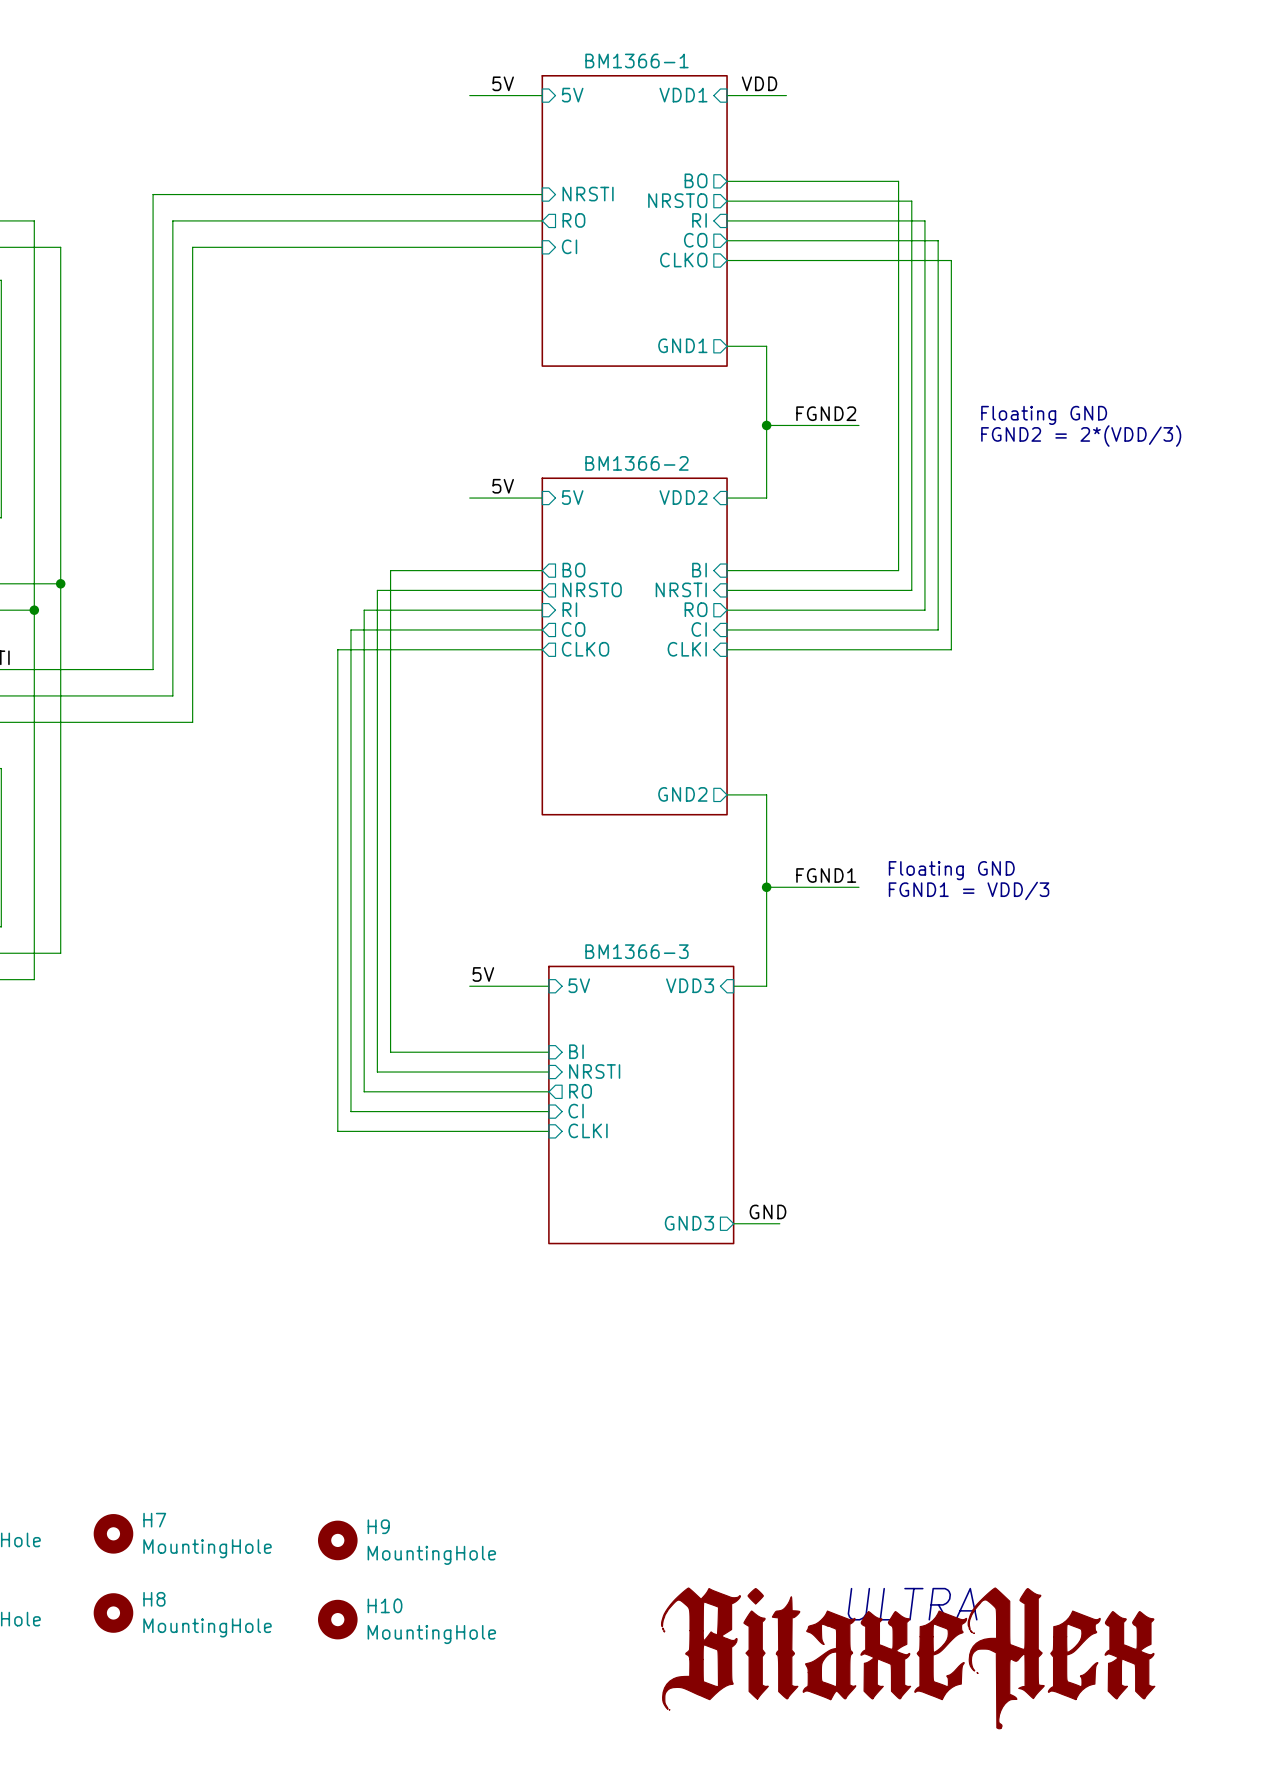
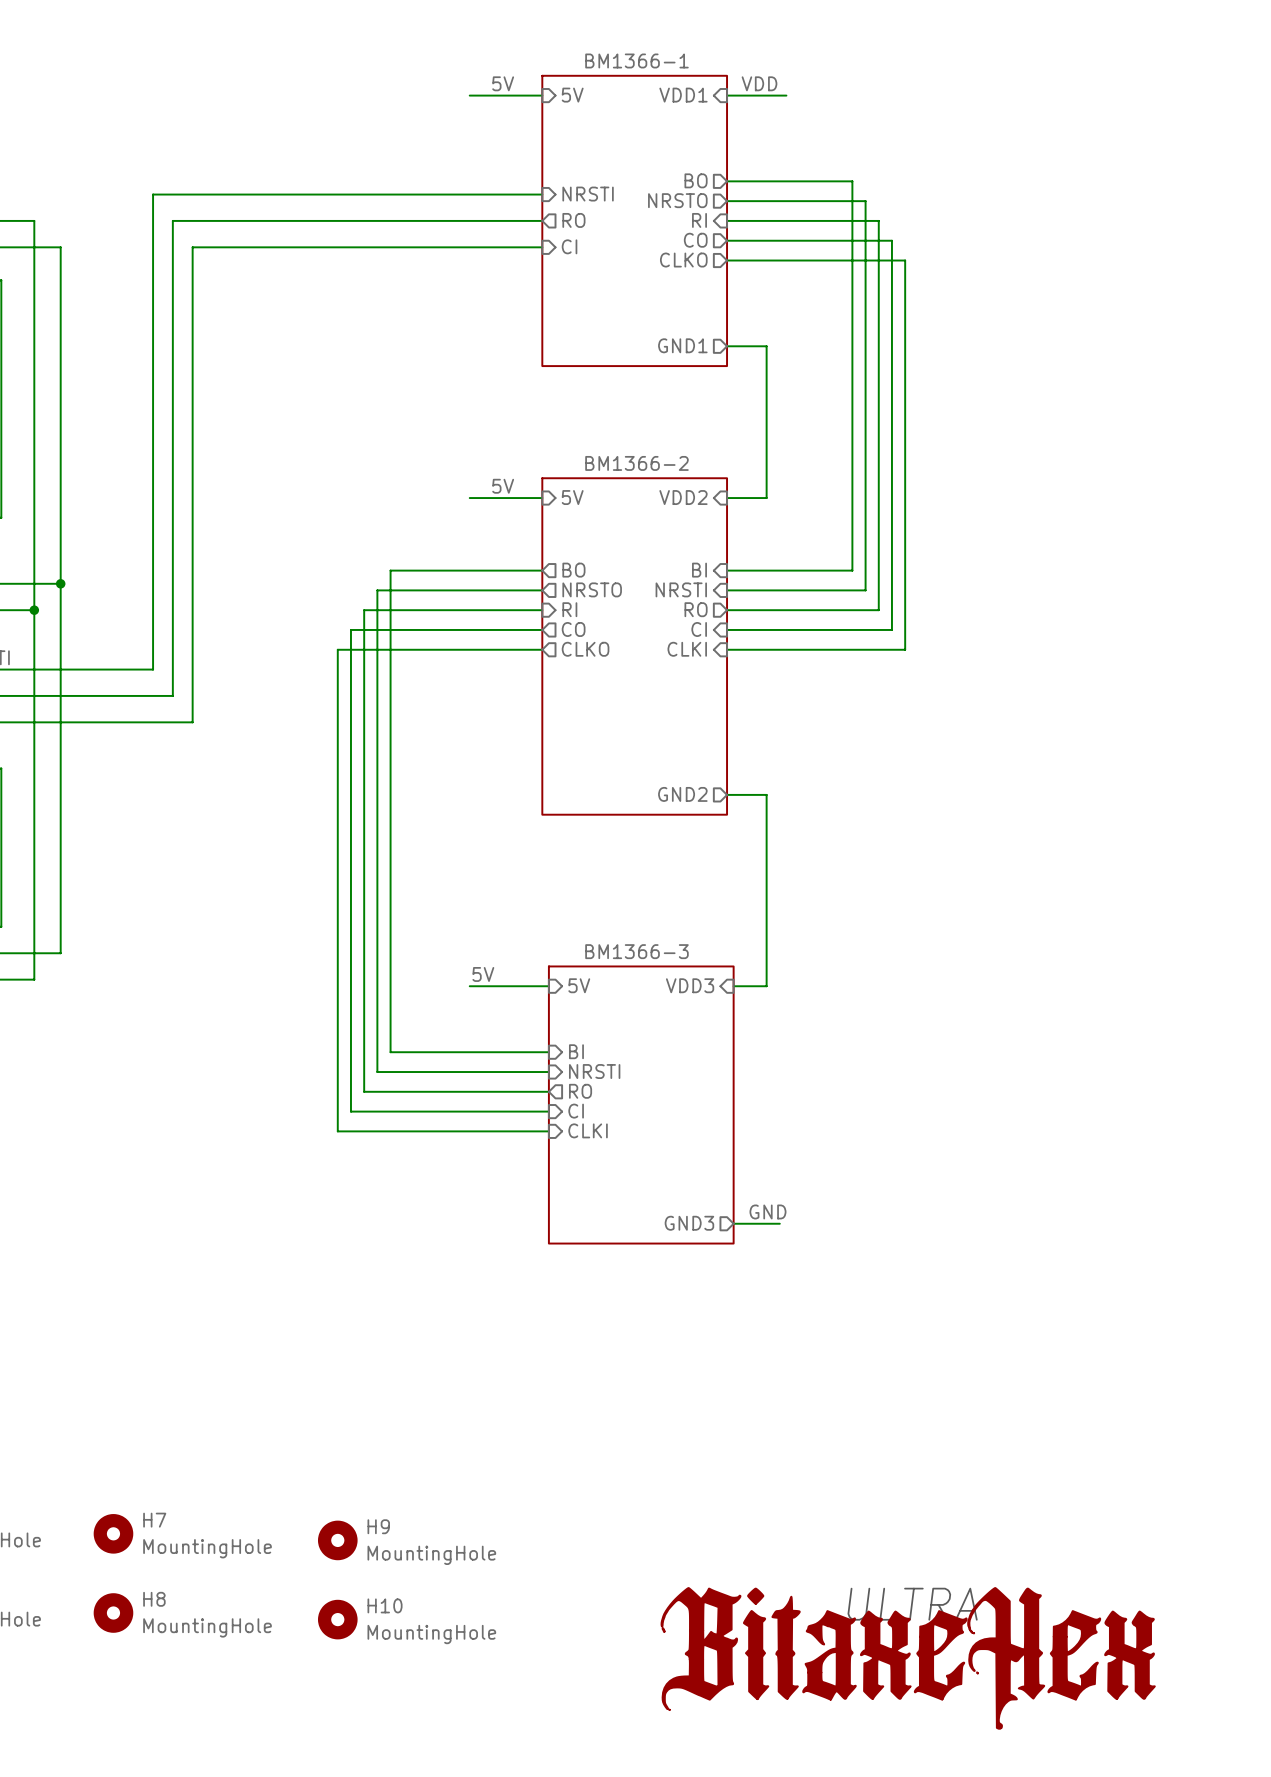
wire: (852, 181) (898, 181) (898, 570) (852, 570) -> (852, 181) (852, 570)
wire: (865, 201) (911, 201) (911, 590) (865, 590) -> (865, 201) (865, 590)
wire: (878, 220) (924, 220) (924, 610) (878, 610) -> (878, 220) (878, 610)
wire: (891, 240) (938, 240) (938, 629) (891, 629) -> (891, 240) (891, 629)
wire: (905, 260) (951, 260) (951, 649) (905, 649) -> (905, 260) (905, 649)
label: FGND2 (826, 413) -> none
text: Floating GND (1044, 415) -> none
wire: (766, 425) (858, 425) -> none
junction: (766, 425) -> none
text: FGND2 = 2*(VDD/3) (1081, 436) -> none
text: Floating GND (951, 870) -> none
label: FGND1 (826, 875) -> none
wire: (766, 887) (858, 887) -> none
junction: (766, 887) -> none
text: FGND1 = VDD/3 (969, 890) -> none

